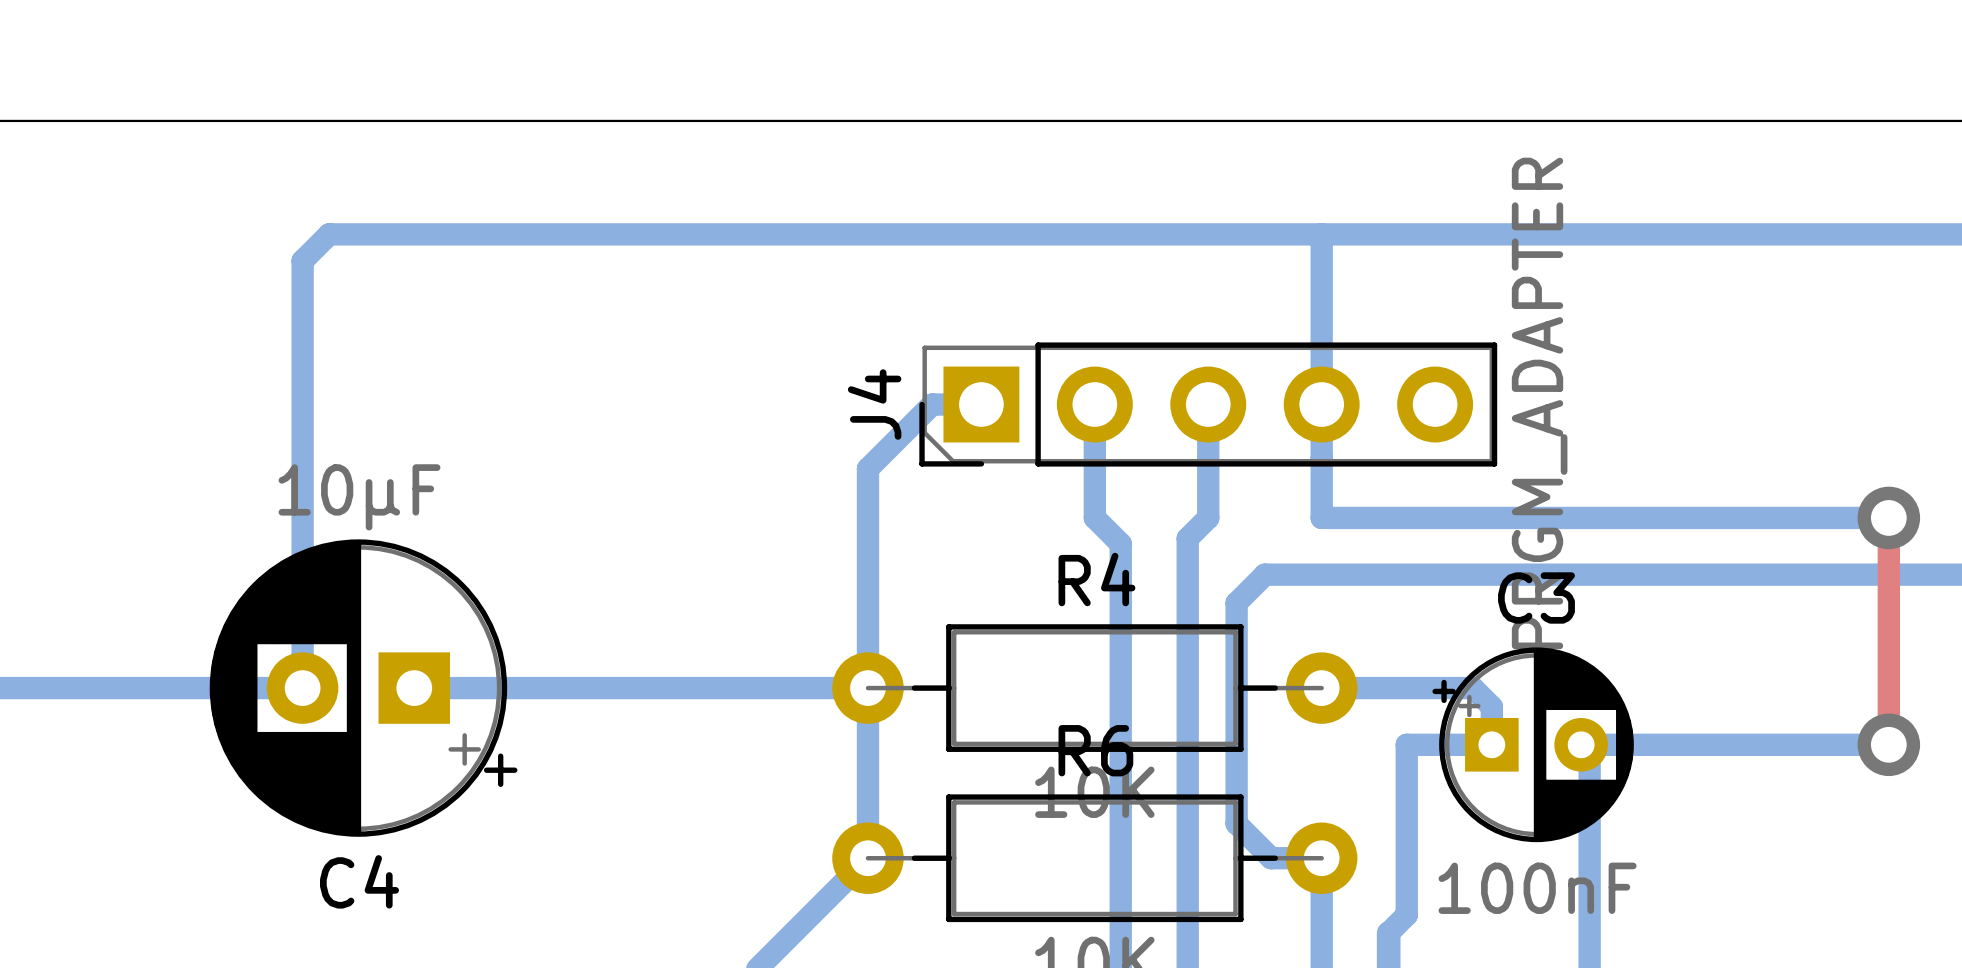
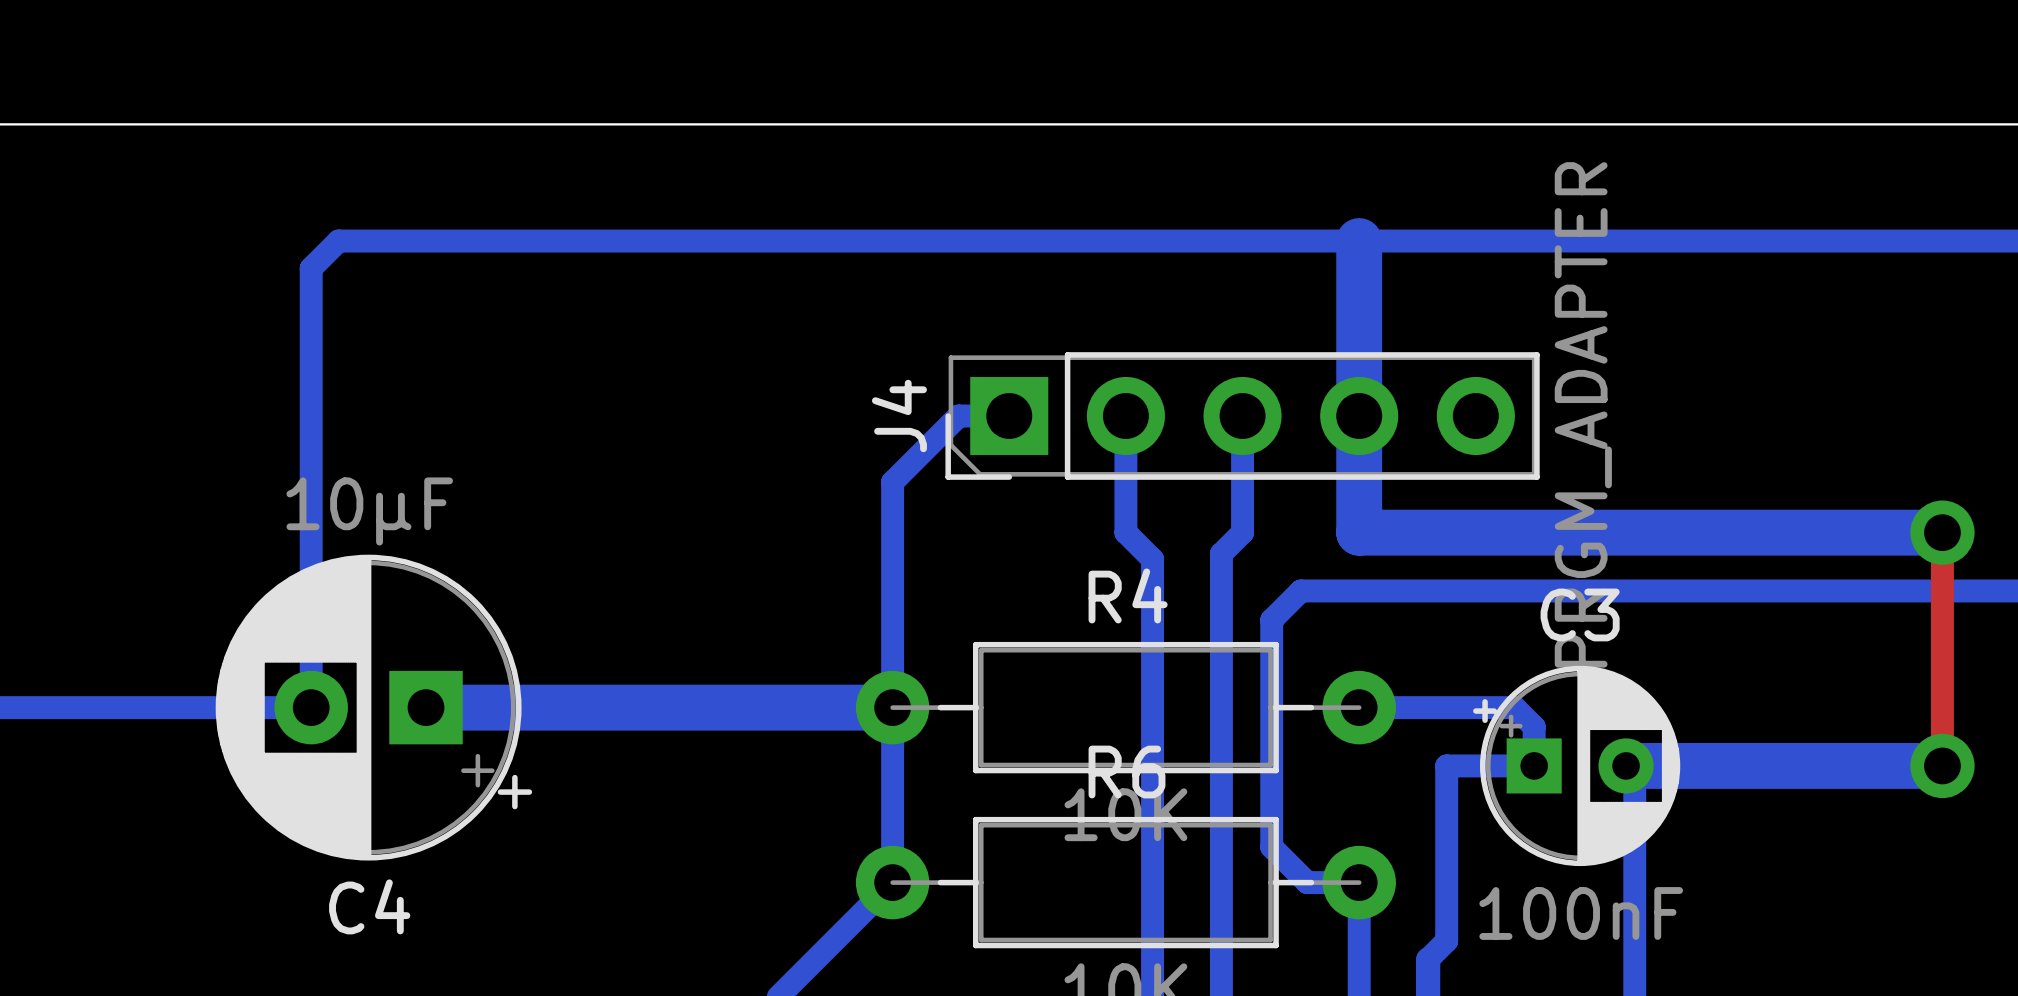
bottom track width: thin (1321, 350) (1321, 234) (1321, 517) (1888, 517) -> thick (1359, 360) (1359, 241) (1359, 532) (1942, 532)
bottom track width: thin (414, 688) (867, 688) -> thick (426, 707) (892, 707)
bottom track width: thin (1581, 744) (1864, 744) -> thick (1626, 765) (1917, 765)

